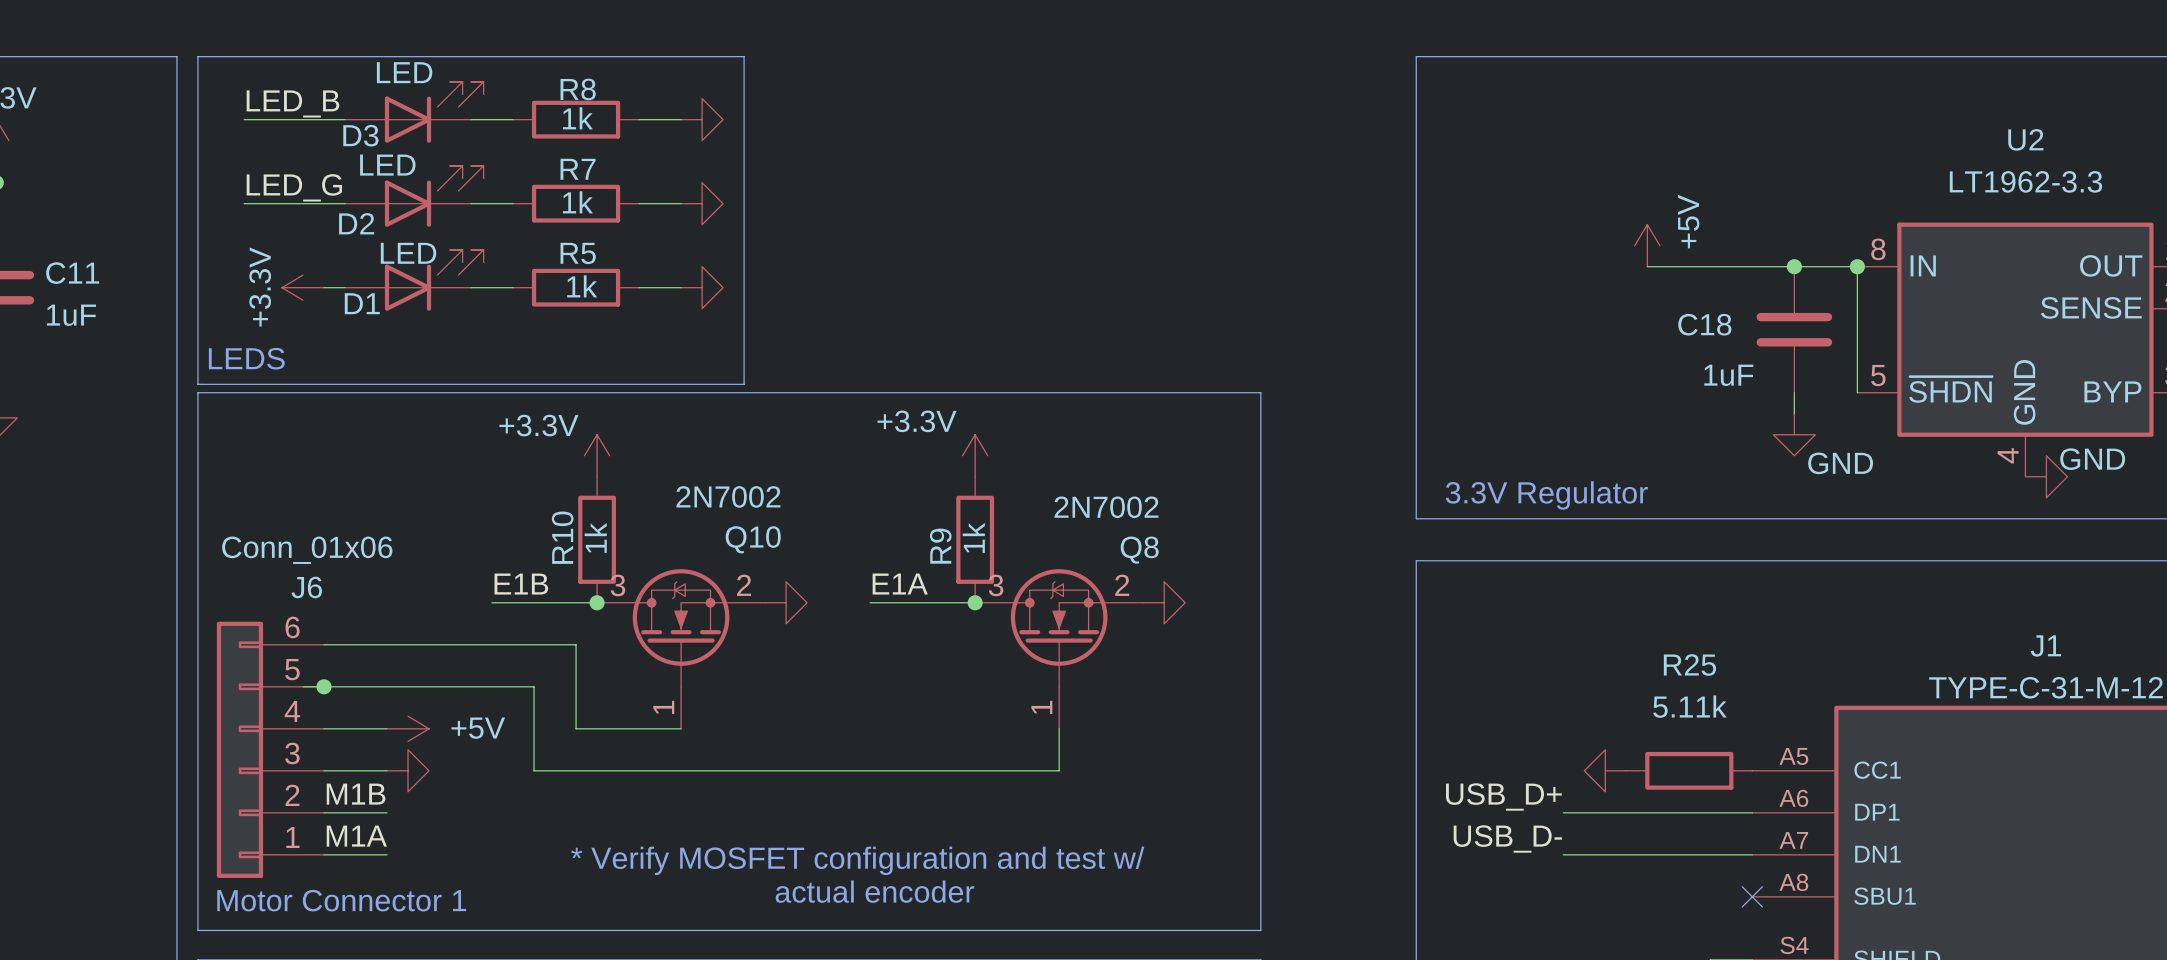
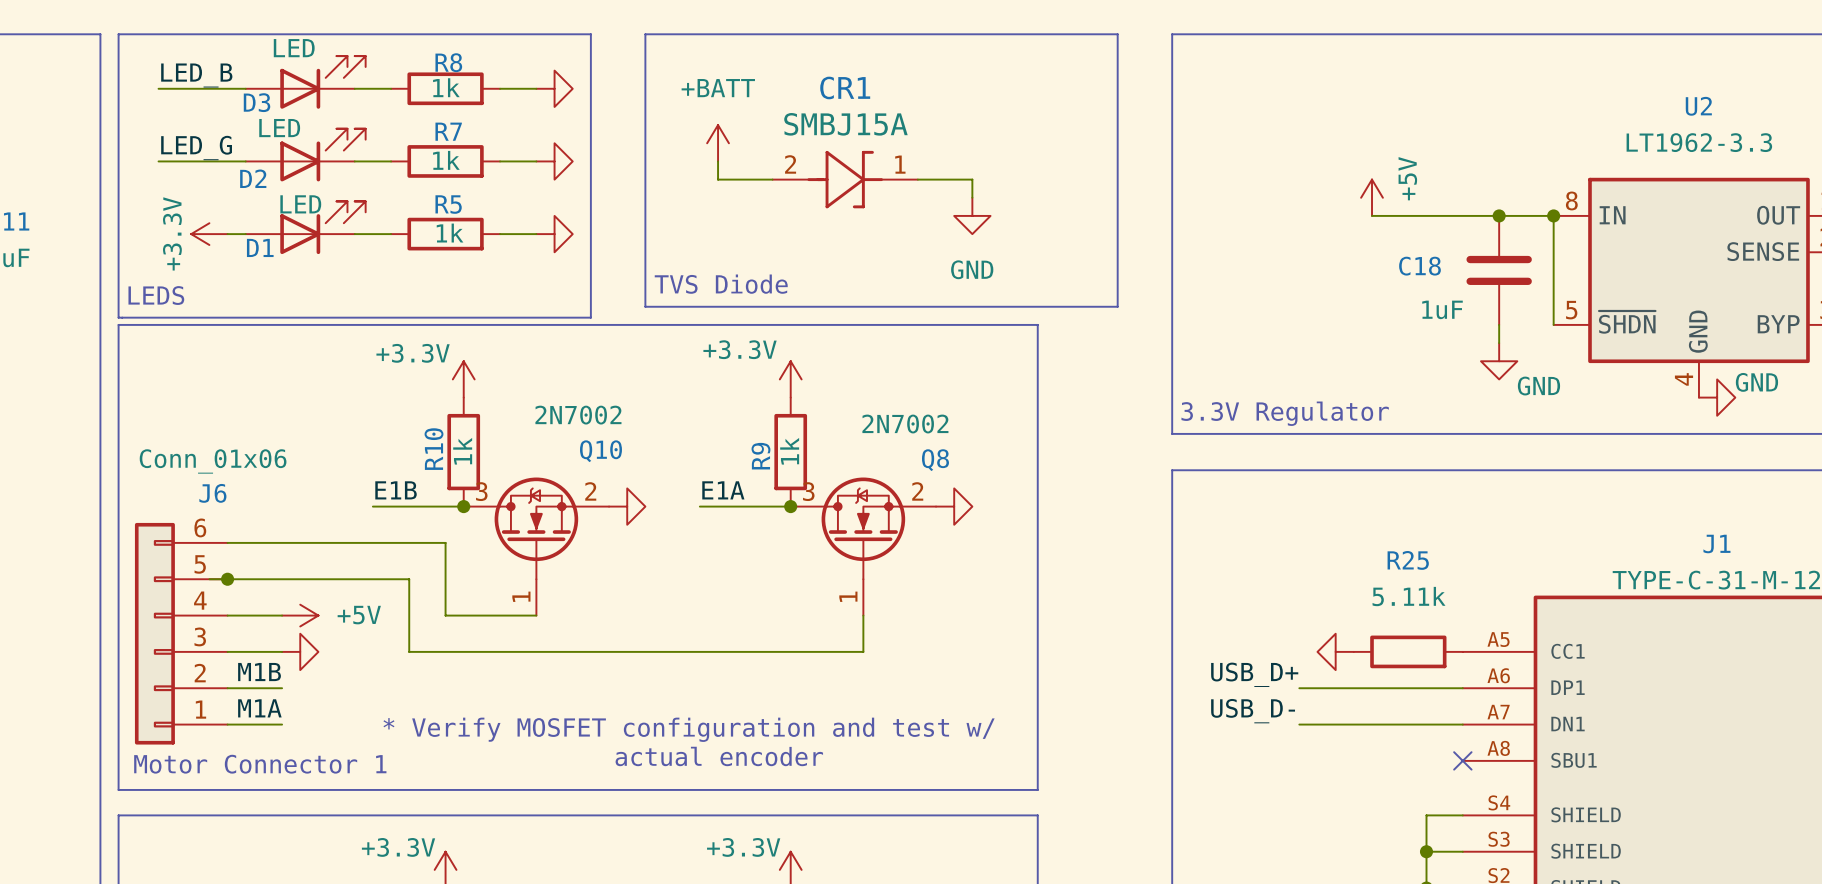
line: none -> (645, 34) (1117, 34) (1117, 306) (645, 306) (645, 34)
power symbol: none -> +BATT (718, 143)
wire: none -> (718, 161) (718, 179) (772, 179)
CR1: none -> SMBJ15A (845, 179)
wire: none -> (917, 179) (972, 179) (972, 197)
power symbol: none -> GND (972, 215)
text: none -> TVS Diode (721, 284)

